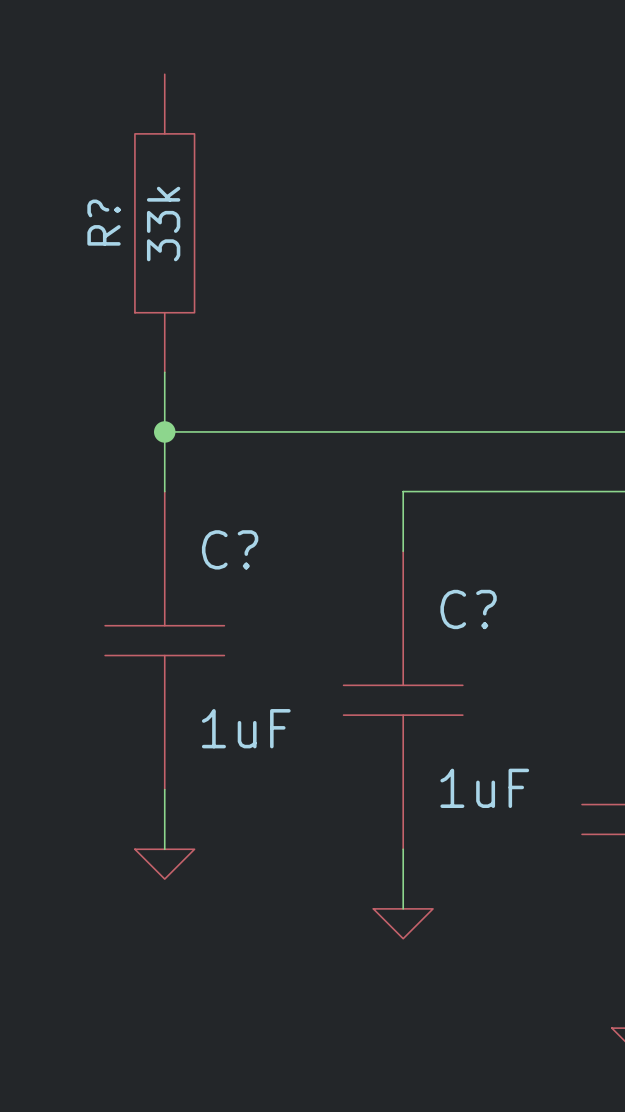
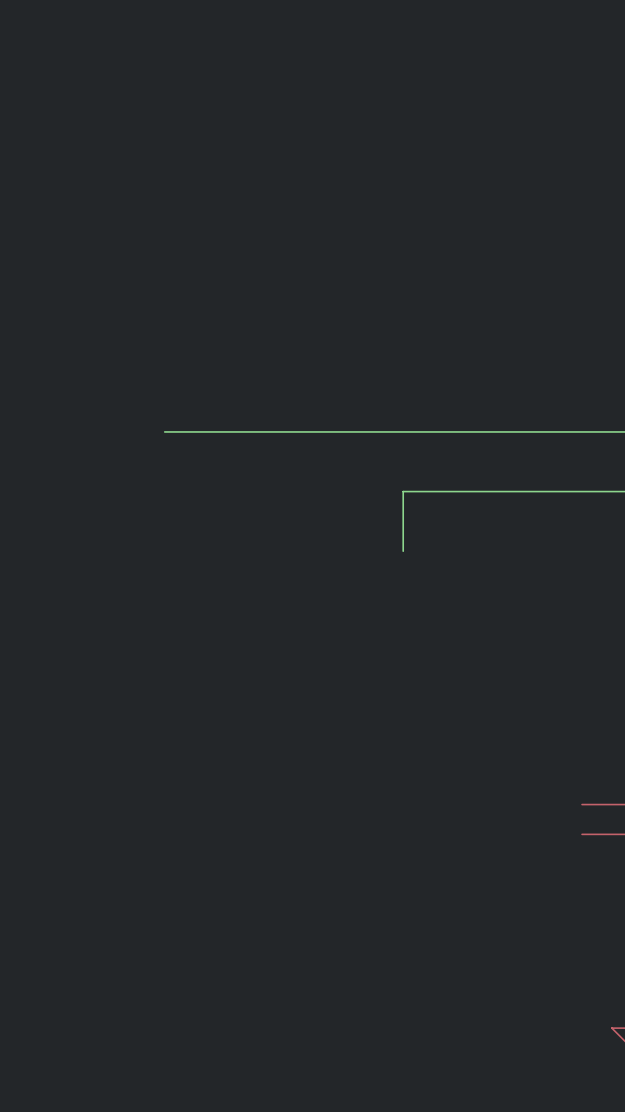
R?: 33k (164, 223) -> none
wire: (164, 372) (164, 491) -> none
junction: (164, 431) -> none
C?: 1uF (164, 640) -> none
C?: 1uF (403, 700) -> none
wire: (164, 789) (164, 849) -> none
wire: (403, 849) (403, 908) -> none
power symbol: (164, 864) -> none
power symbol: (403, 923) -> none

